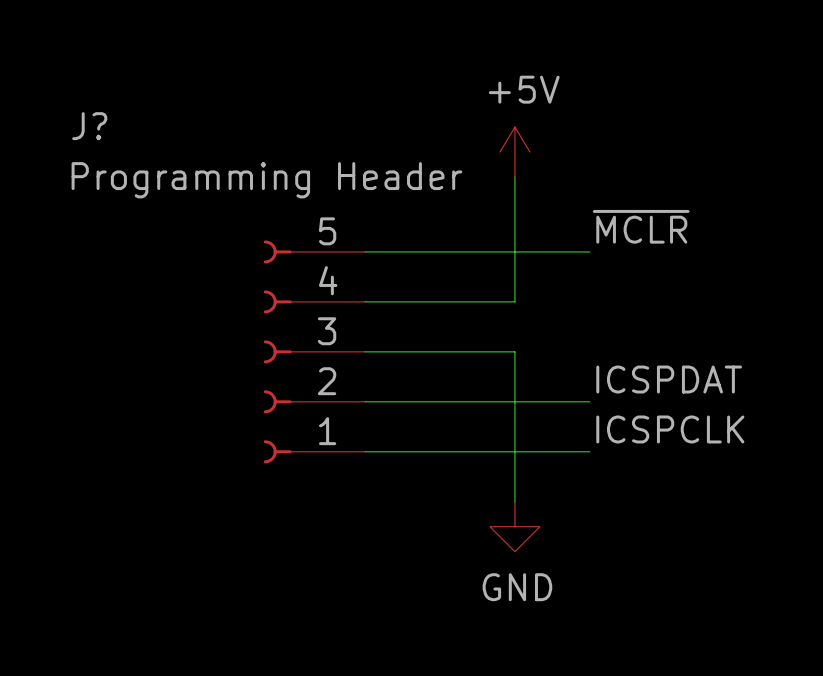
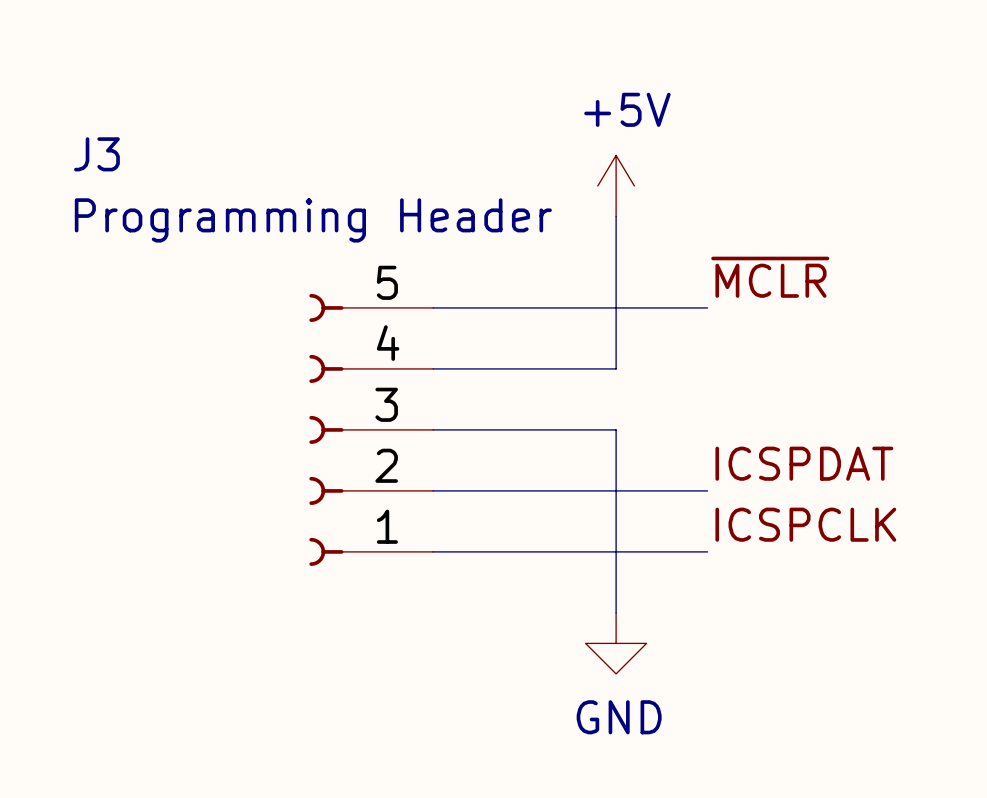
J? name: J? (89, 126) -> J3 (96, 154)

